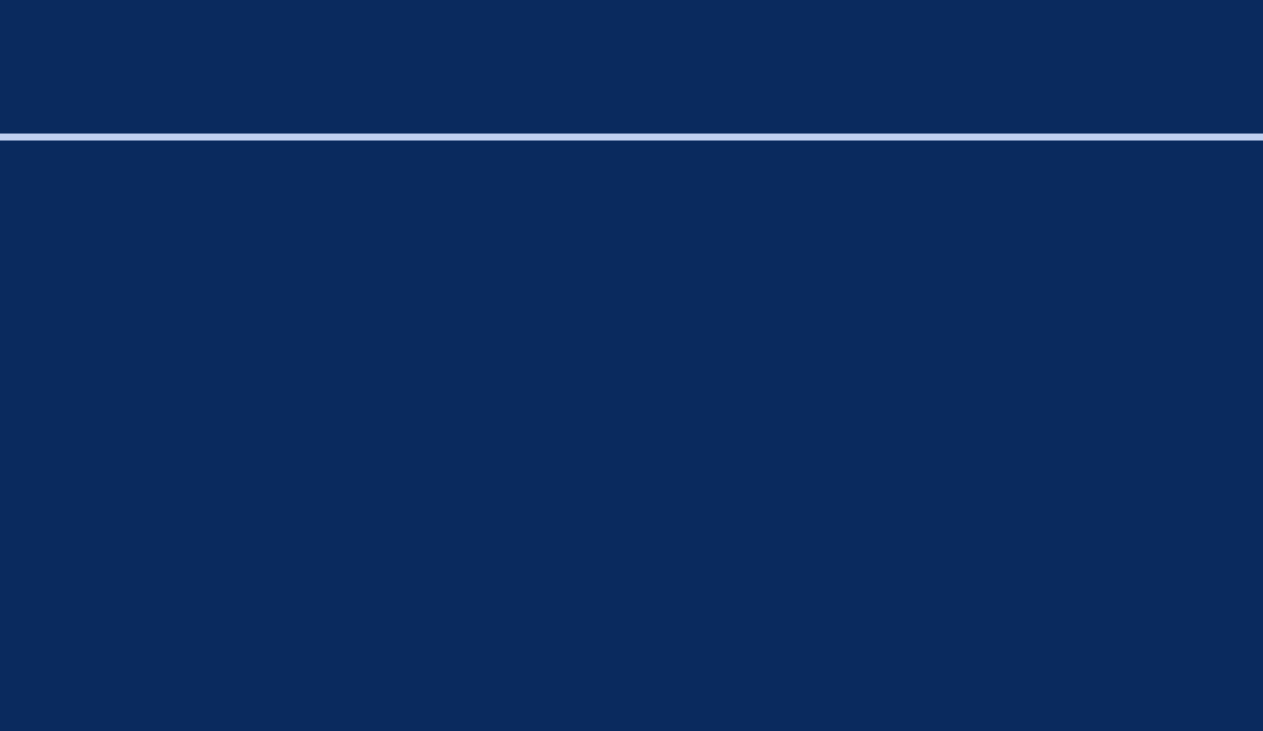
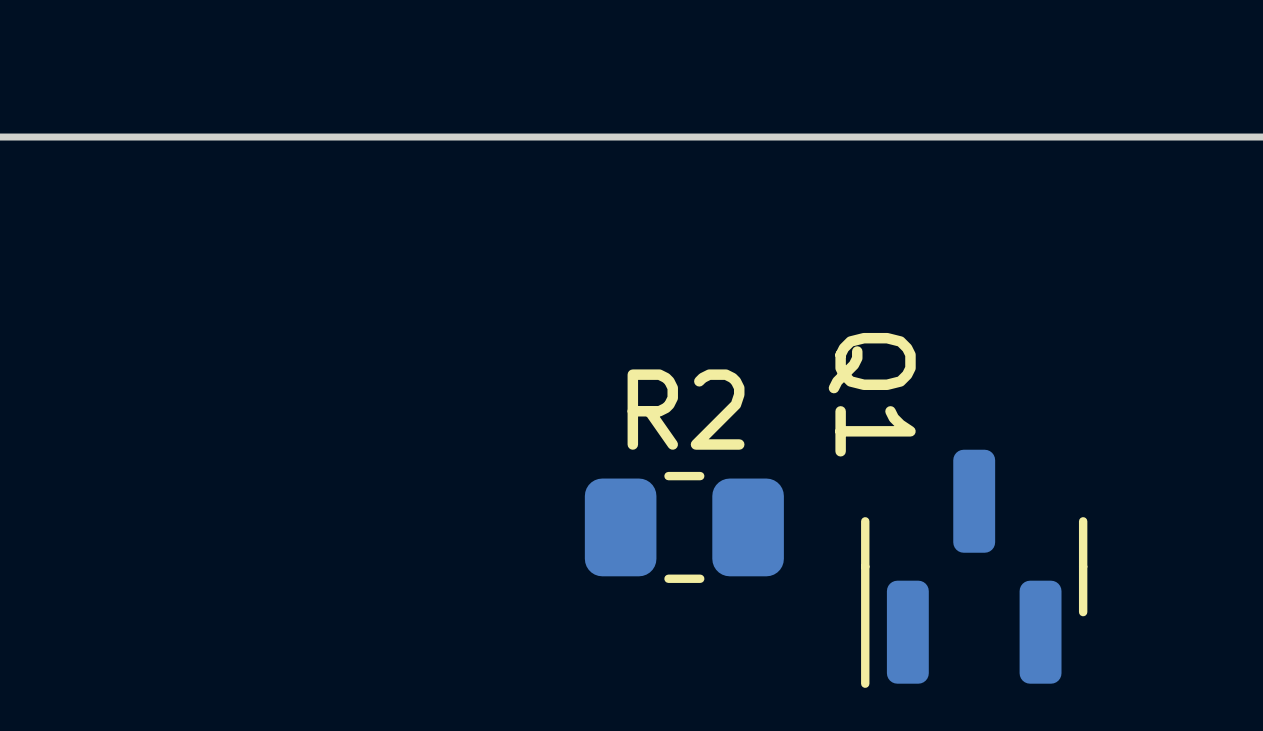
R2: none -> (684, 527)
Q1: none -> (974, 568)

